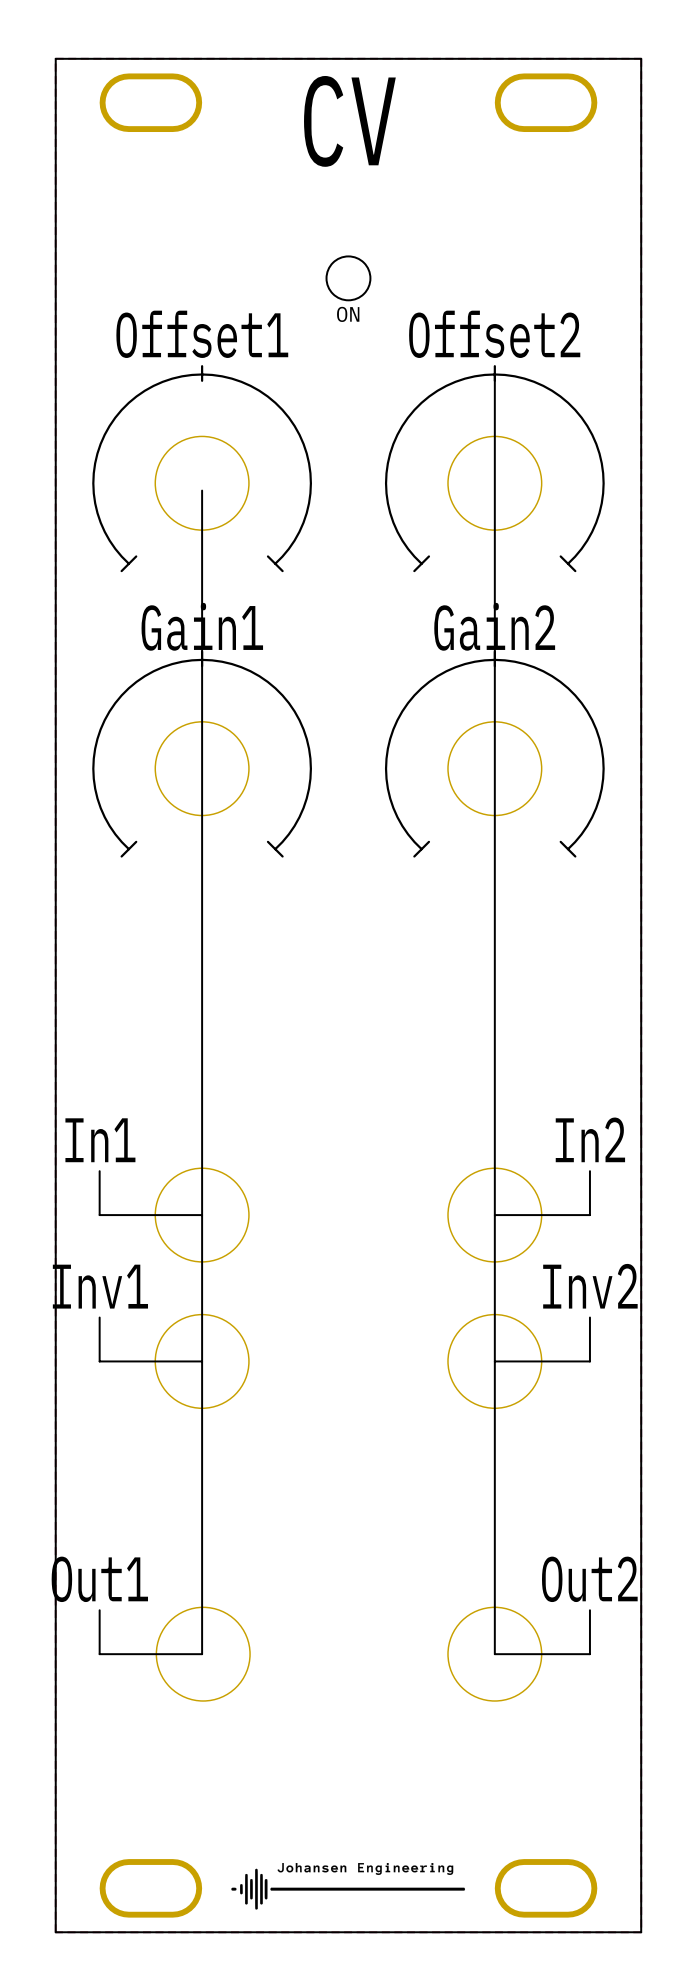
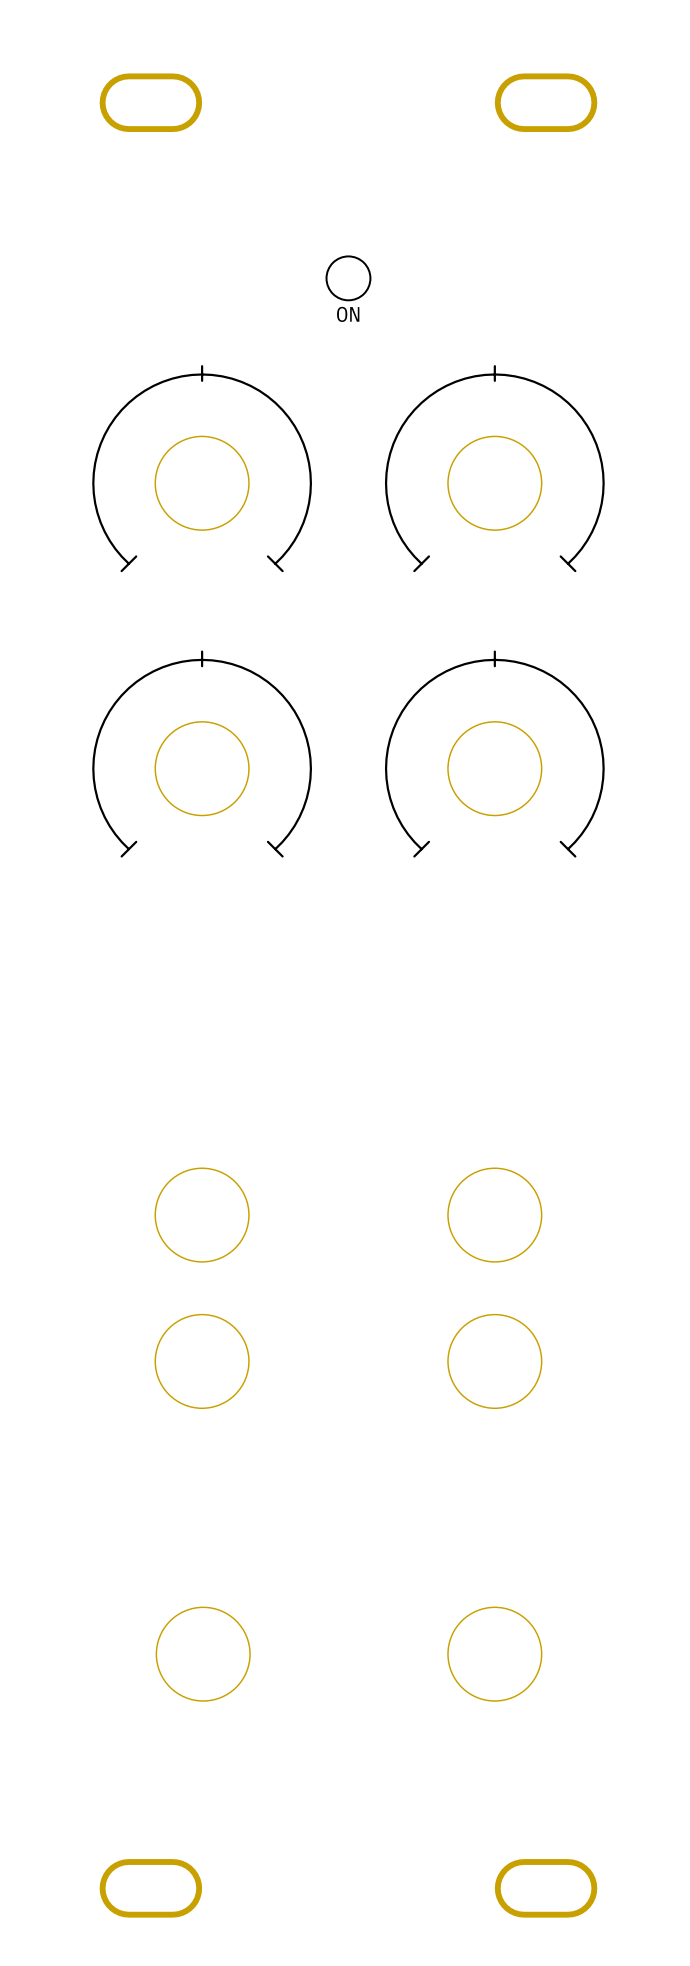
board edge: (55, 58) (55, 1932) (641, 1932) (641, 58) (55, 58) -> none
text: CV (349, 121) -> none
text: Offset1 (202, 334) -> none
text: Offset2 (494, 334) -> none
line: (494, 373) (494, 1654) (589, 1654) (589, 1610) -> none
line: (202, 490) (202, 1654) (99, 1654) (99, 1610) -> none
text: Gain1 (202, 626) -> none
text: Gain2 (494, 626) -> none
text: In2 (590, 1139) -> none
text: In1 (100, 1140) -> none
line: (99, 1171) (99, 1215) (202, 1215) -> none
line: (589, 1171) (589, 1215) (494, 1215) -> none
text: Inv1 (100, 1286) -> none
text: Inv2 (590, 1286) -> none
line: (99, 1317) (99, 1361) (202, 1361) -> none
line: (589, 1317) (589, 1361) (494, 1361) -> none
text: Out1 (99, 1579) -> none
text: Out2 (589, 1579) -> none
drawing: [231, 1862, 466, 1910] -> none

